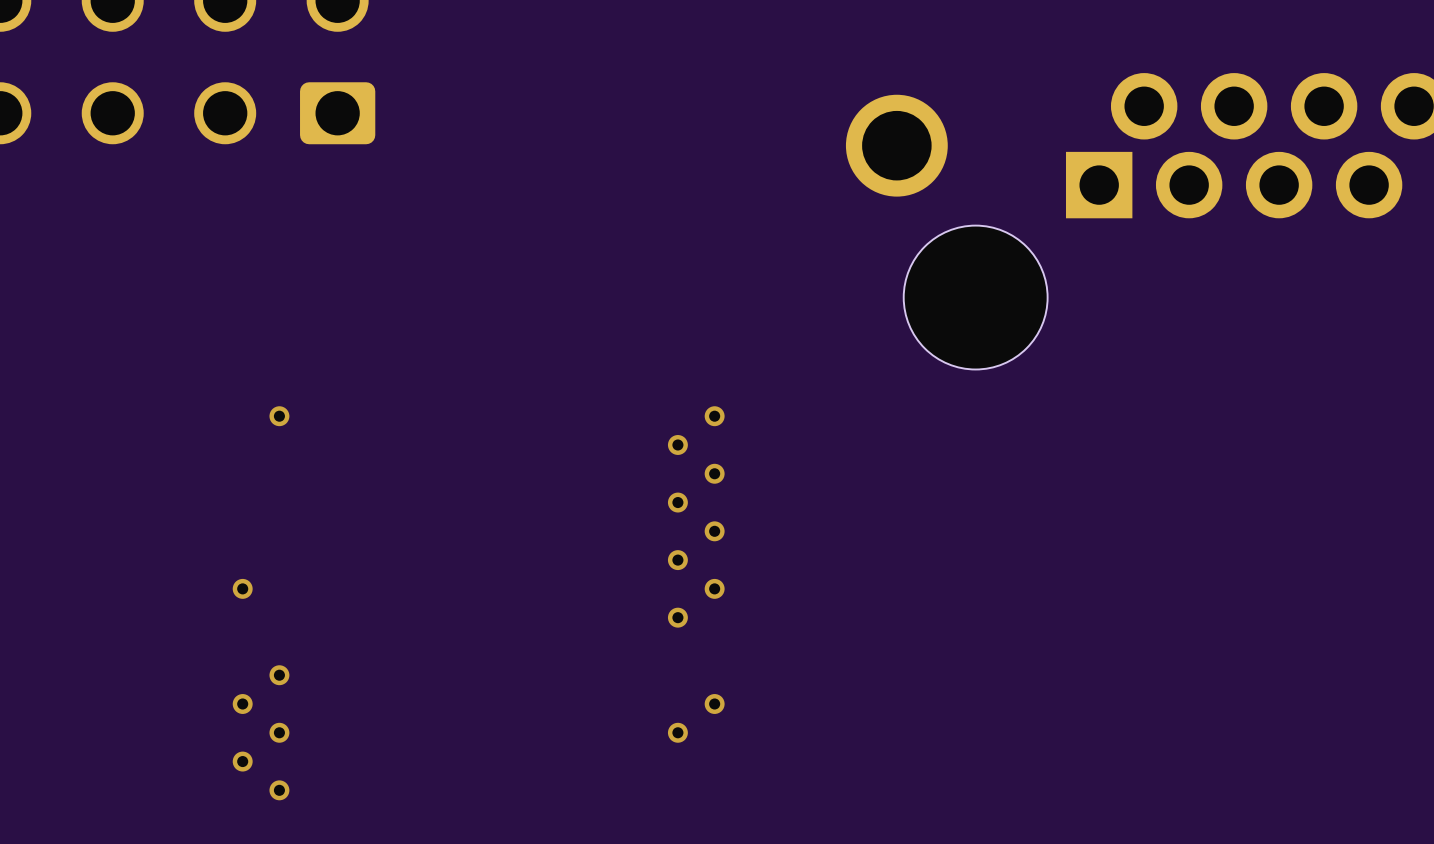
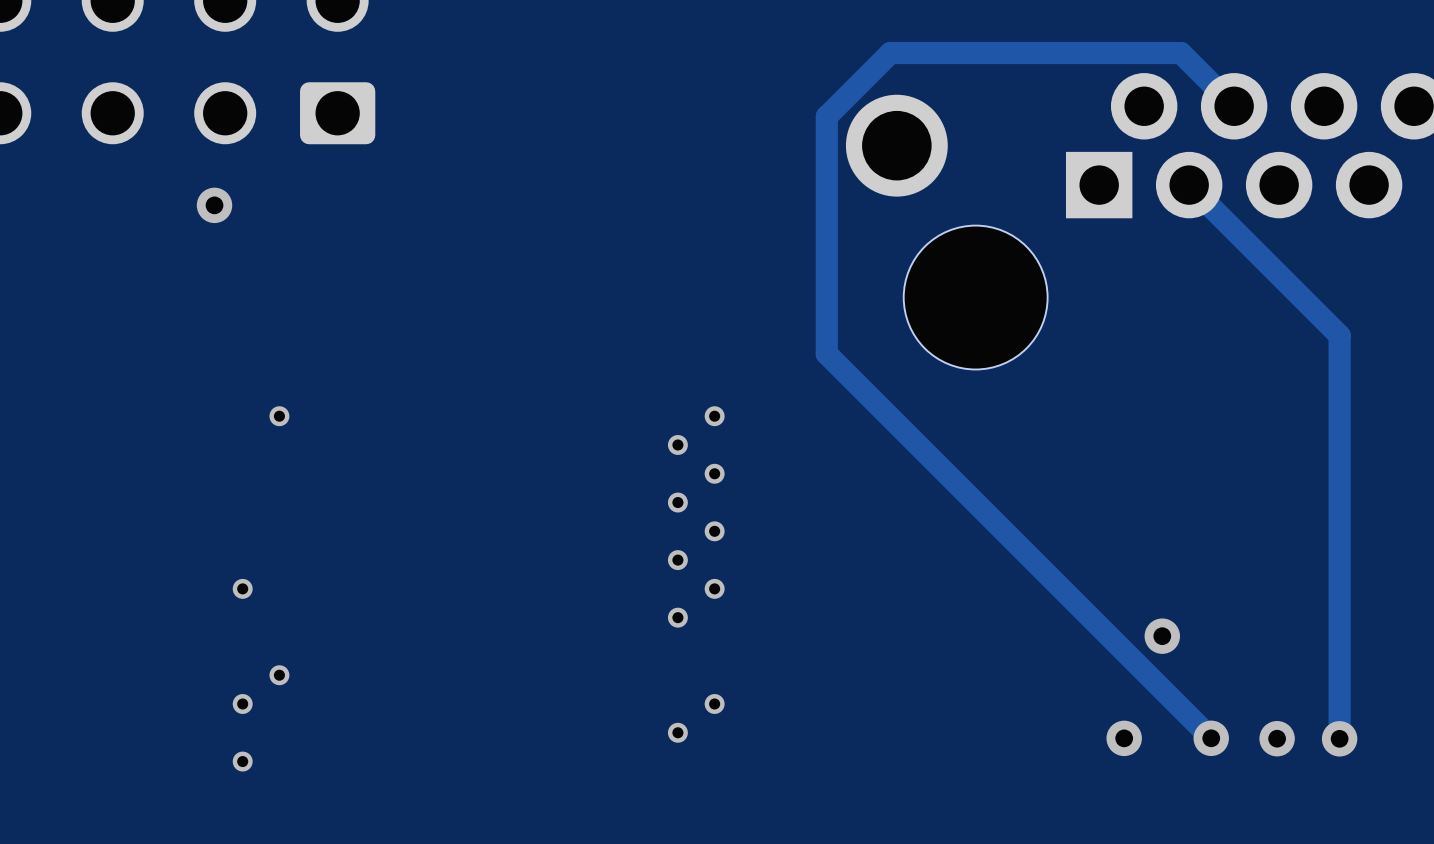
track: none -> (1234, 106) (1180, 53) (890, 53) (826, 116) (826, 353) (1211, 738)
track: none -> (1189, 185) (1339, 335) (1339, 738)
via: none -> (214, 205)
via: none -> (1162, 636)
via: (279, 732) -> none
via: none -> (1124, 738)
via: none -> (1211, 738)
via: none -> (1277, 738)
via: none -> (1339, 738)
via: (279, 790) -> none

